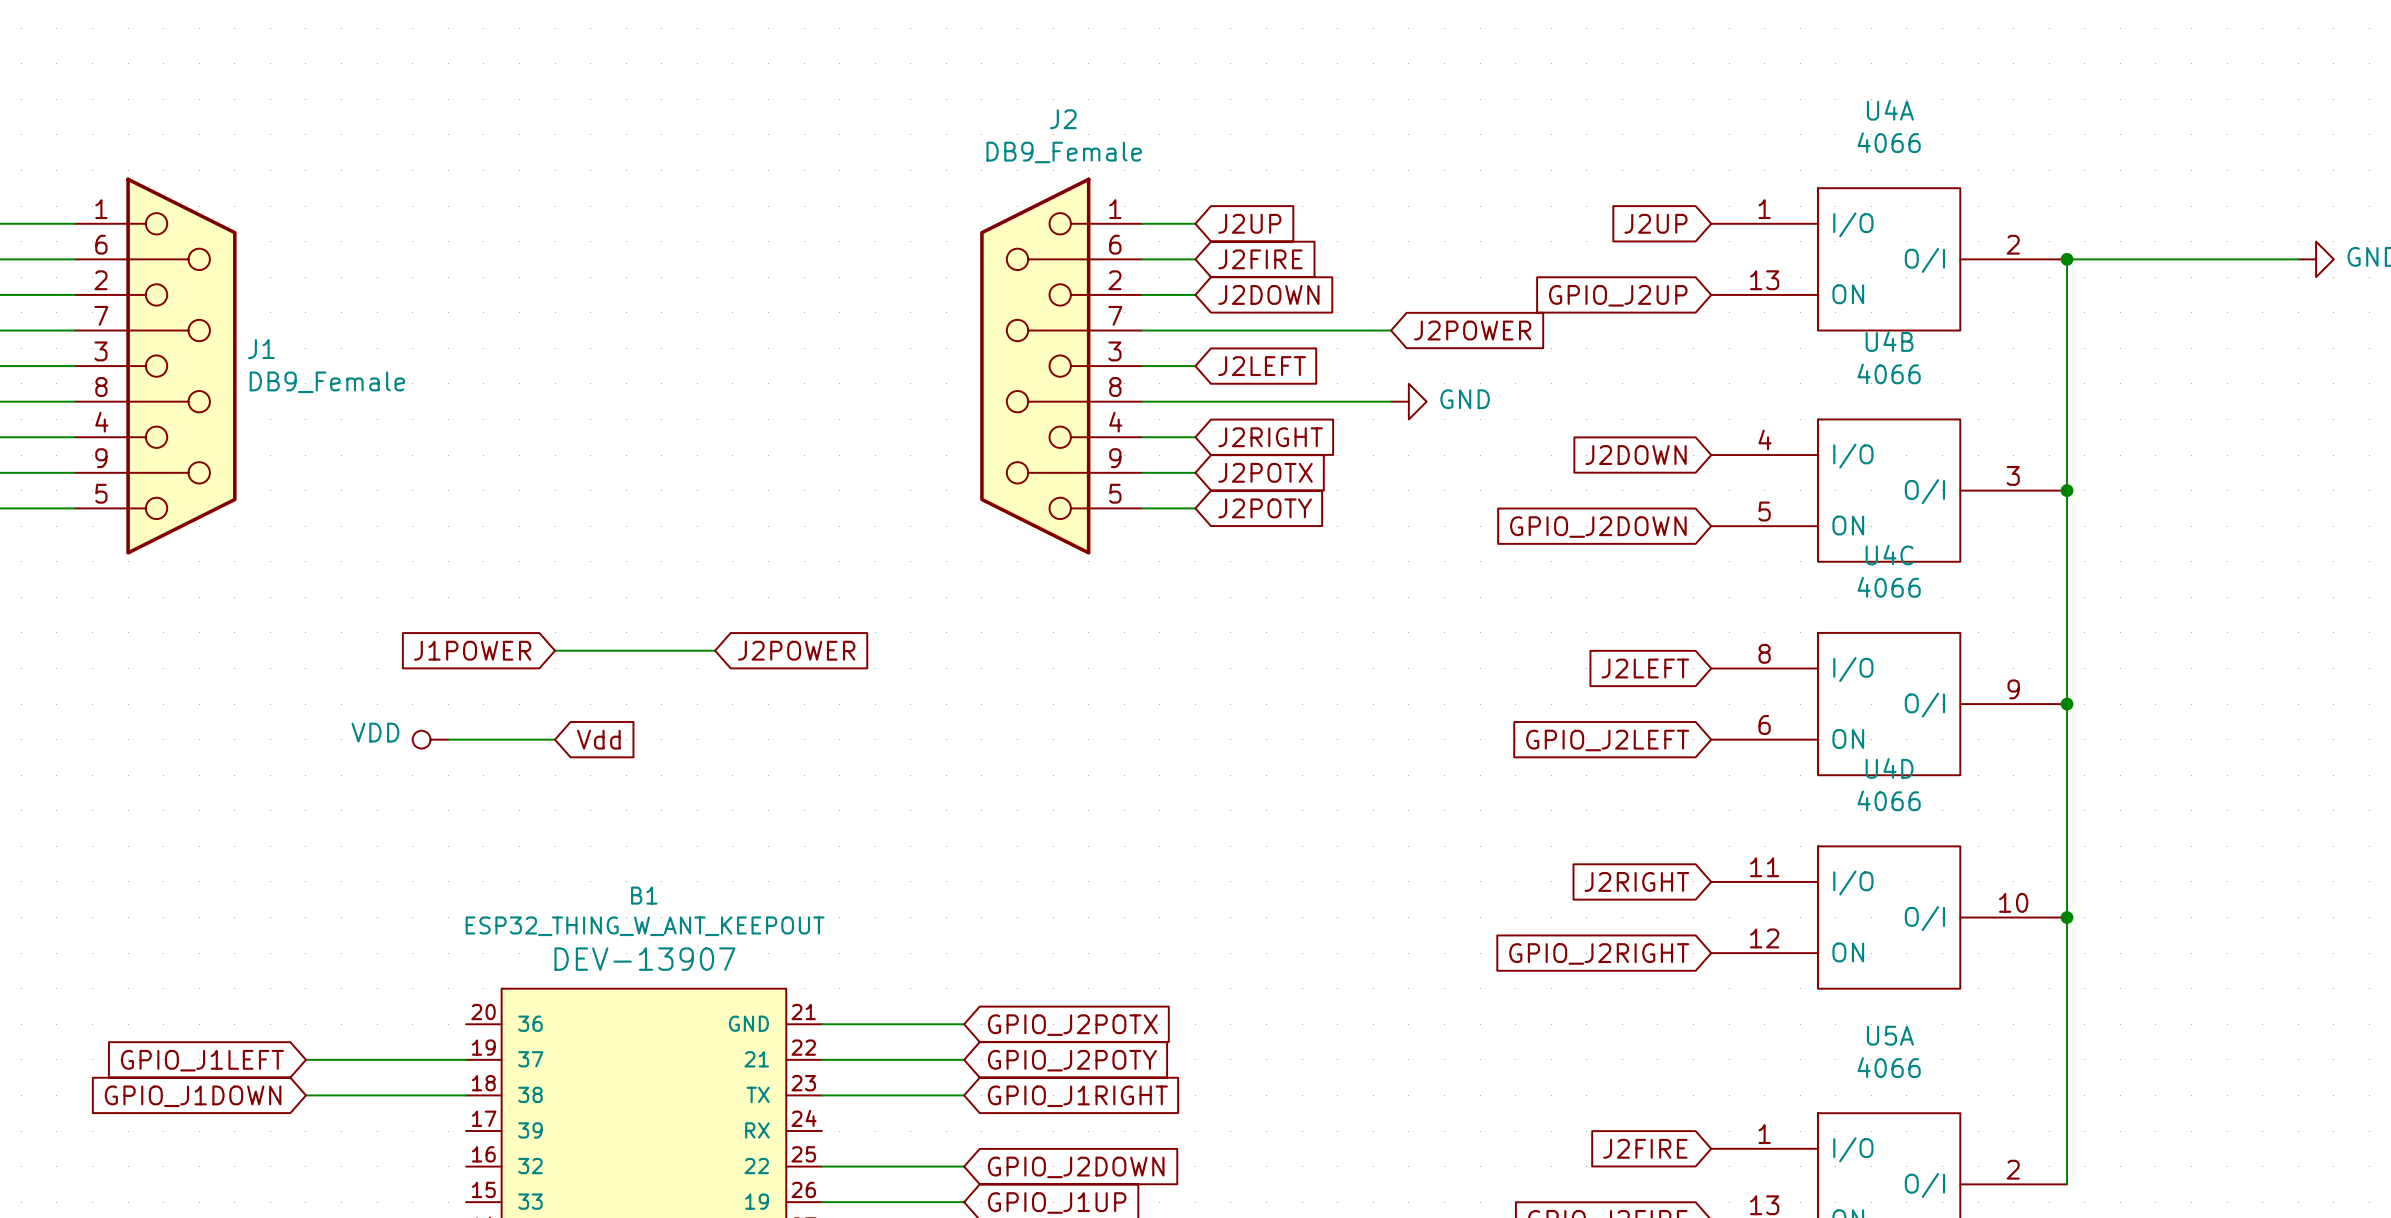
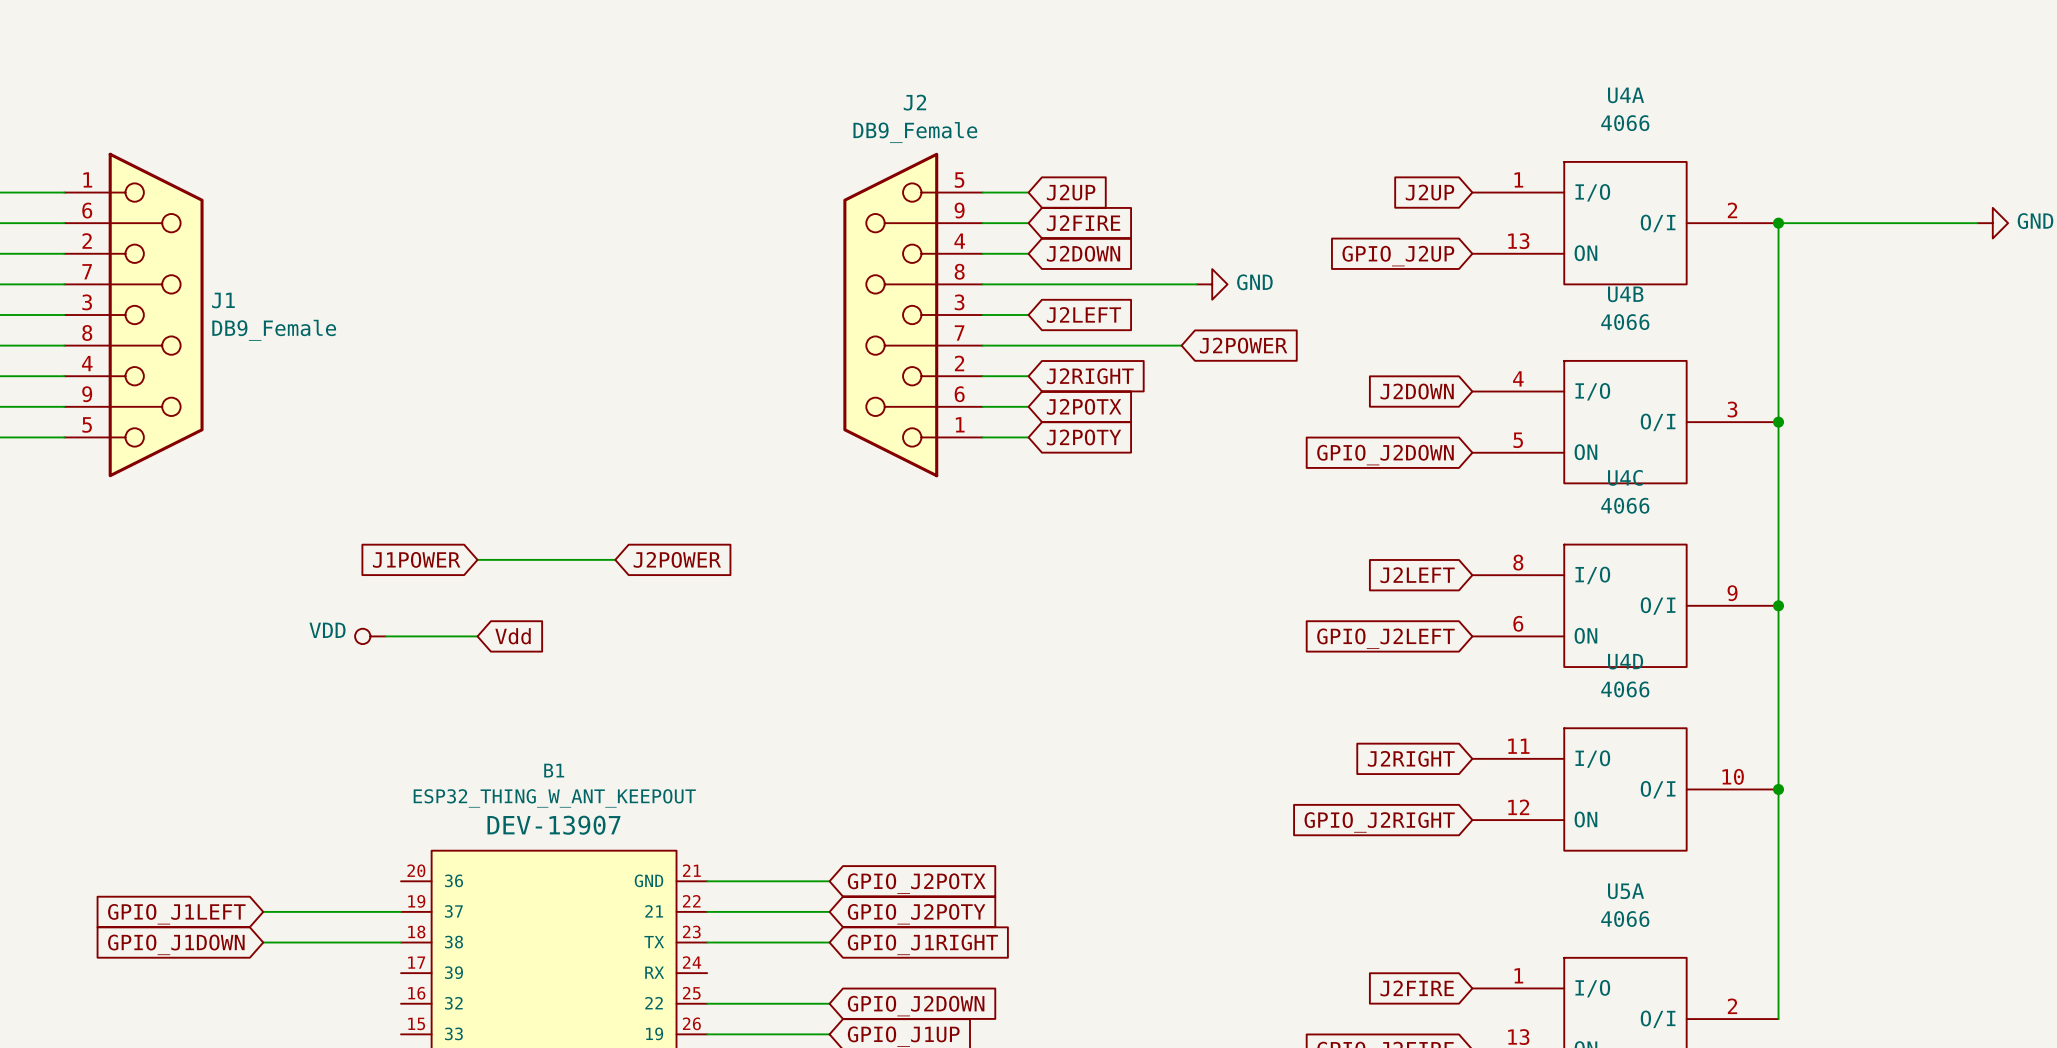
global label position: J2POWER (1472, 330) -> J2POWER (1243, 345)
J2 flip: as is (1035, 366) -> up-down (890, 314)
wire: (1373, 401) (1391, 401) -> none
power symbol position: GND (1408, 401) -> GND (1212, 284)

